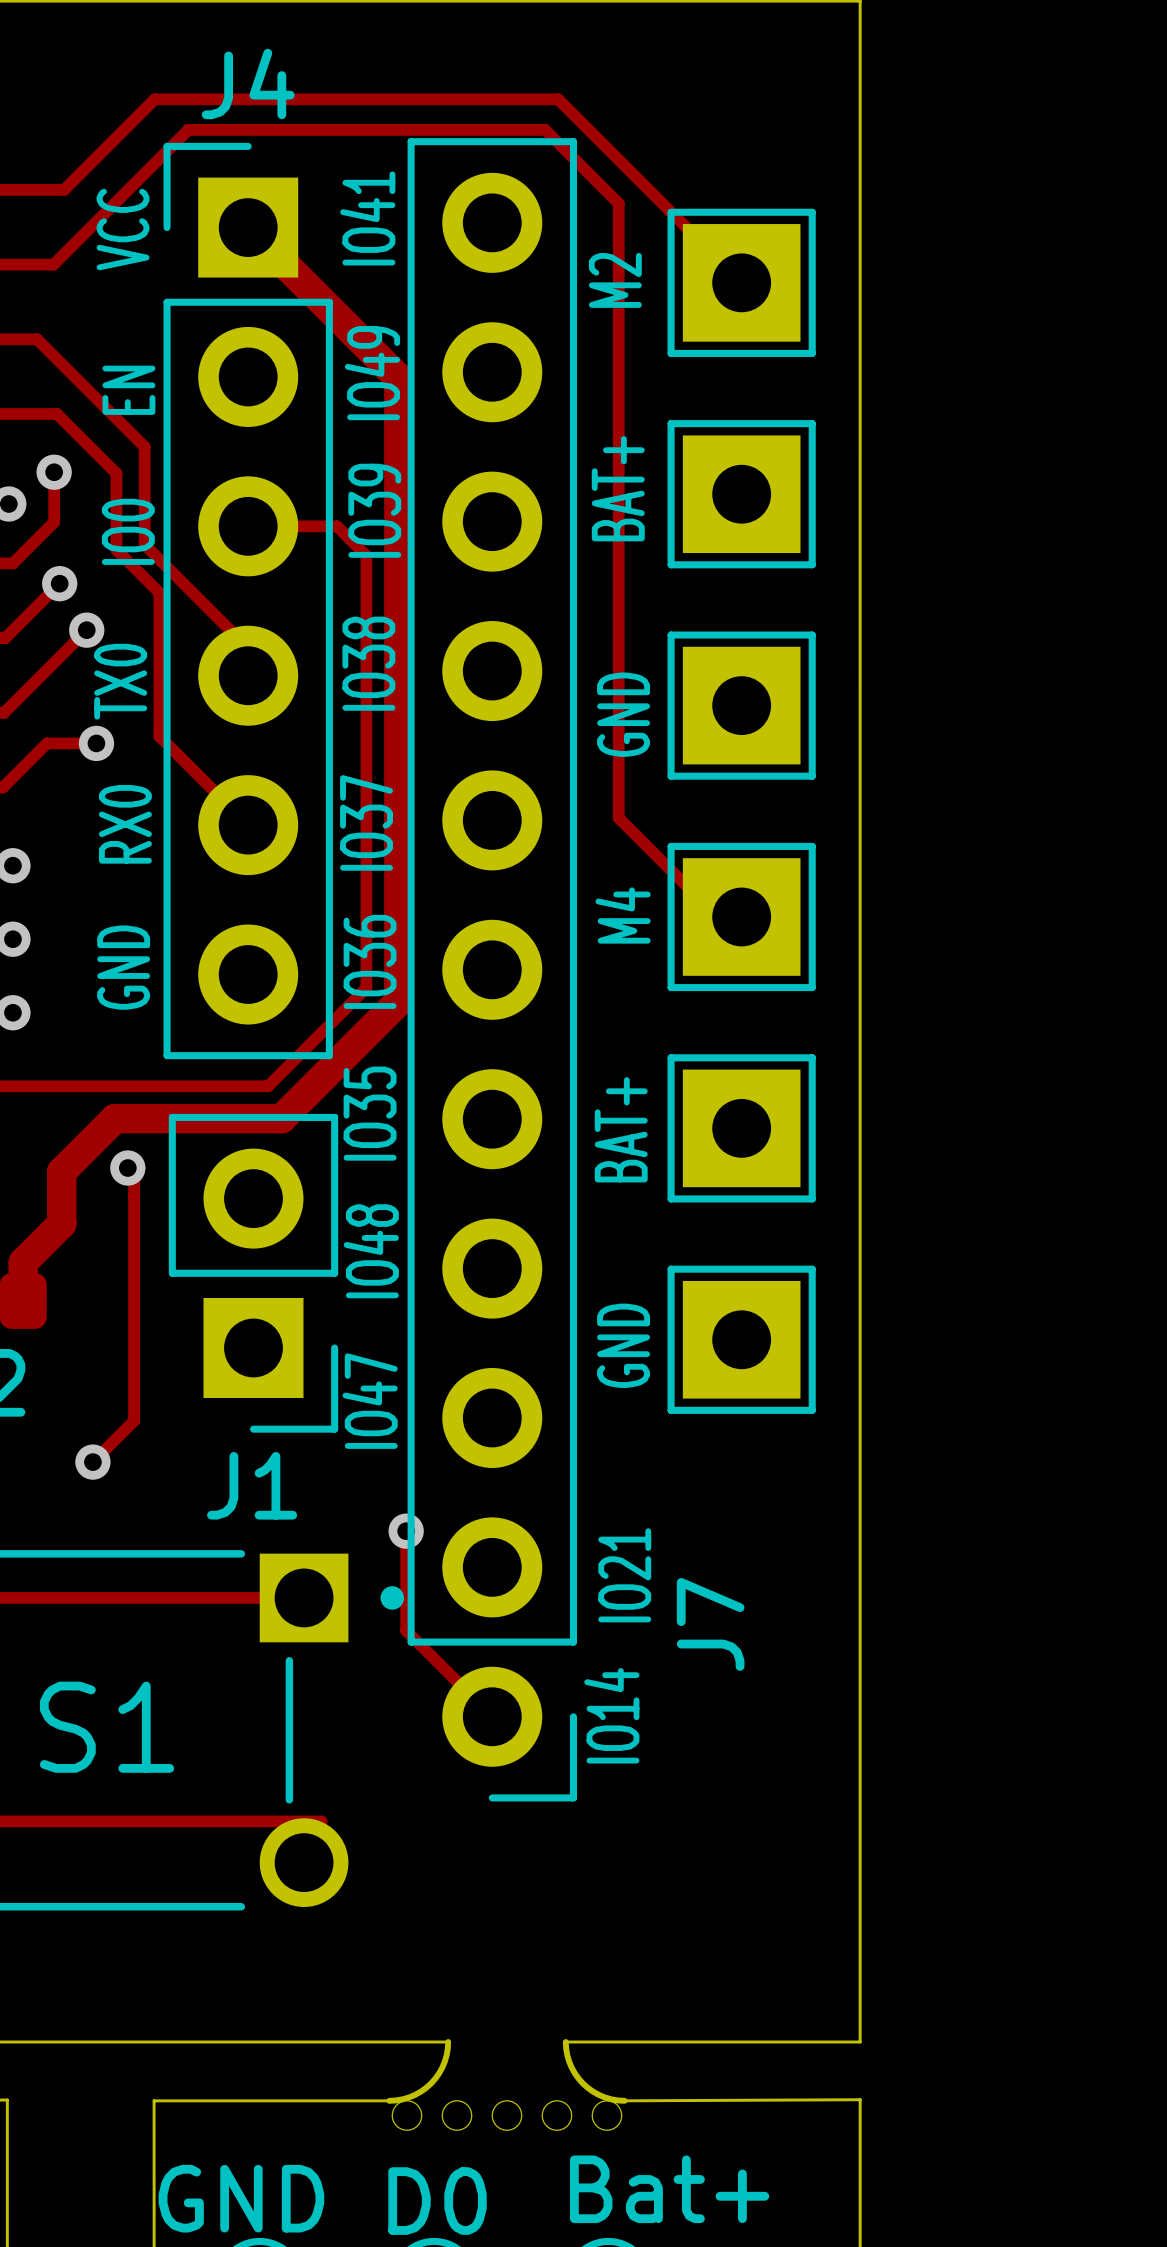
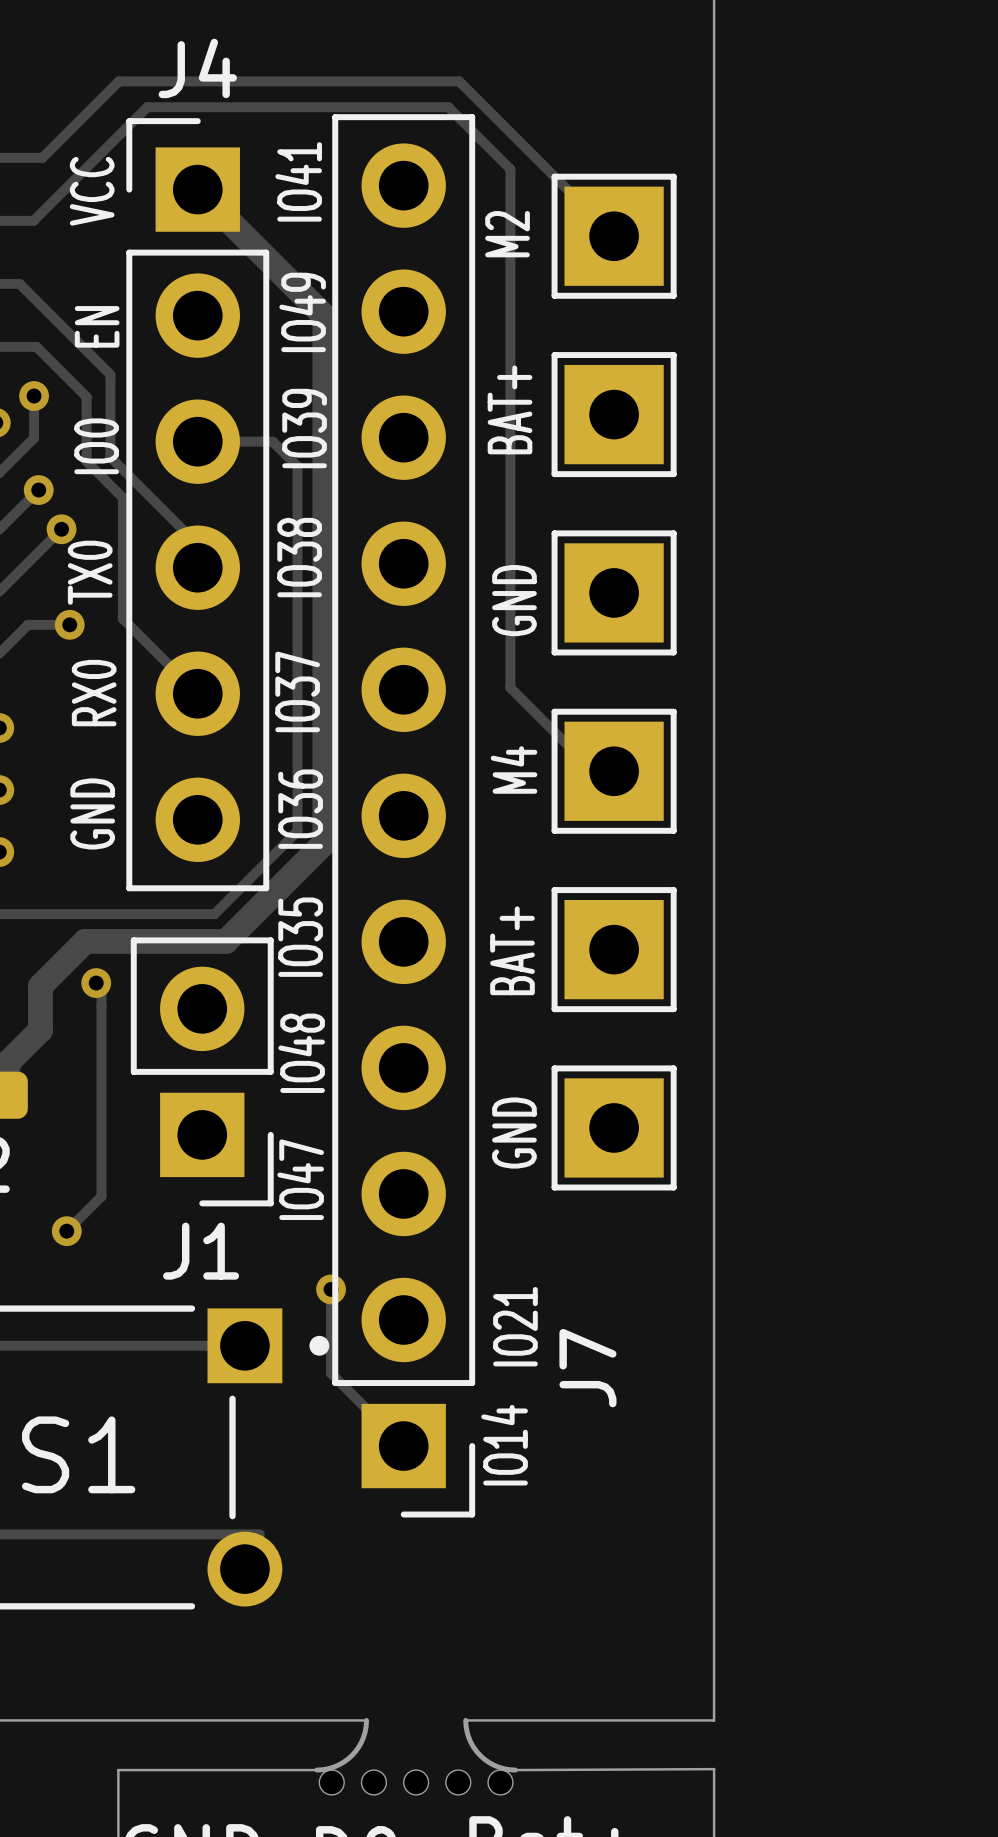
J7 footprint: [407, 138, 577, 1802] -> [332, 114, 476, 1518]

